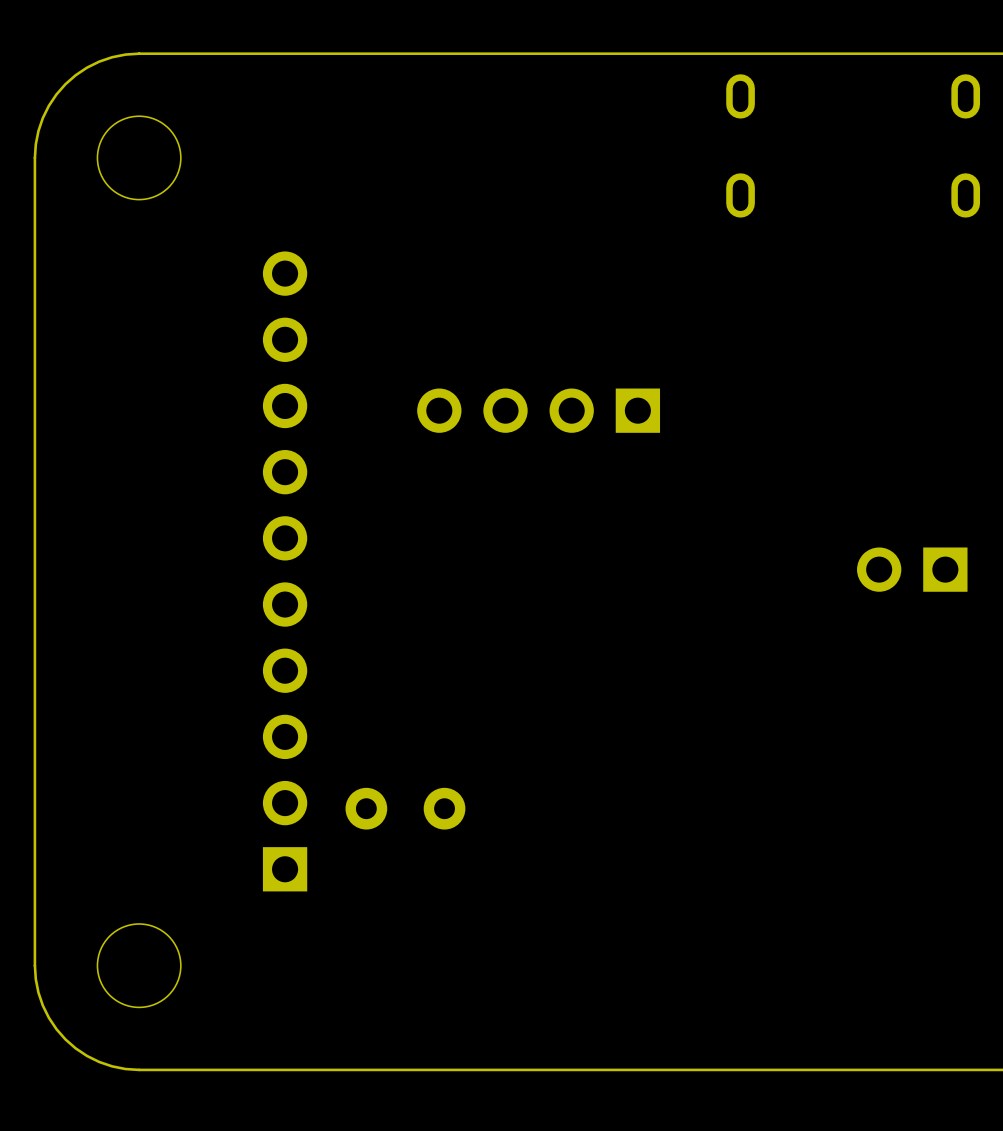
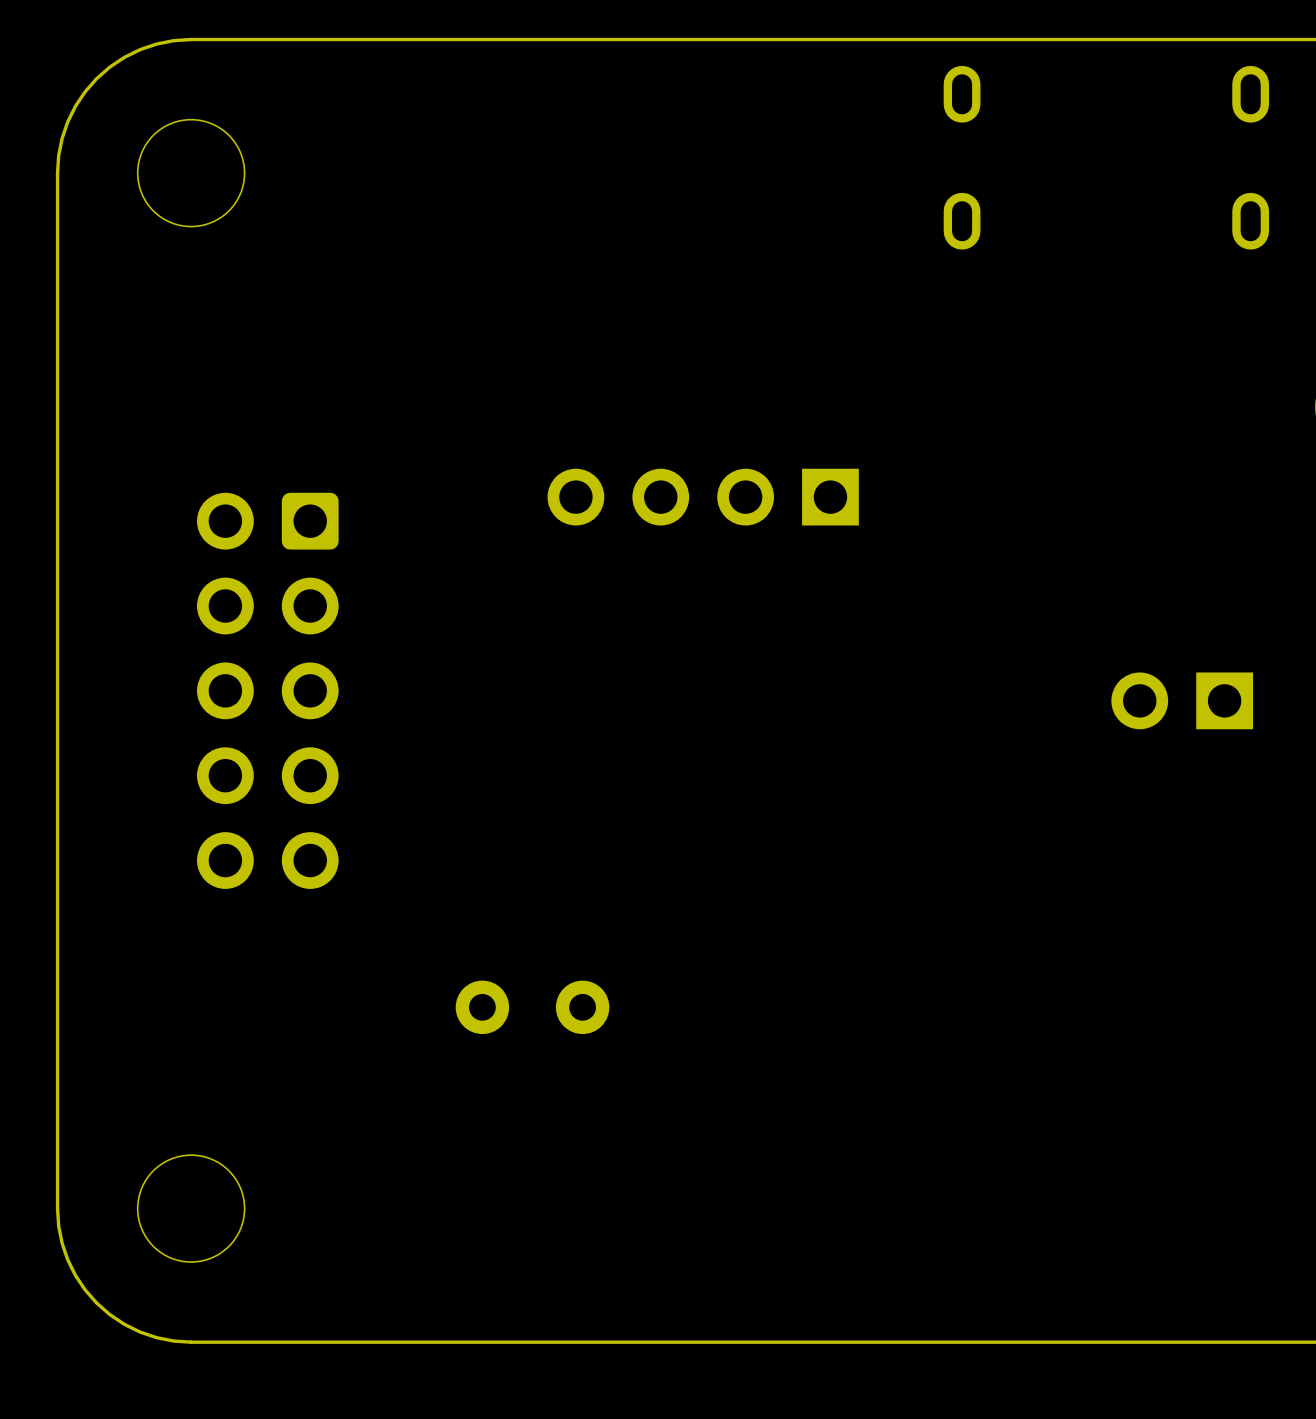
part: none -> (267, 690)
part: (285, 571) -> none

